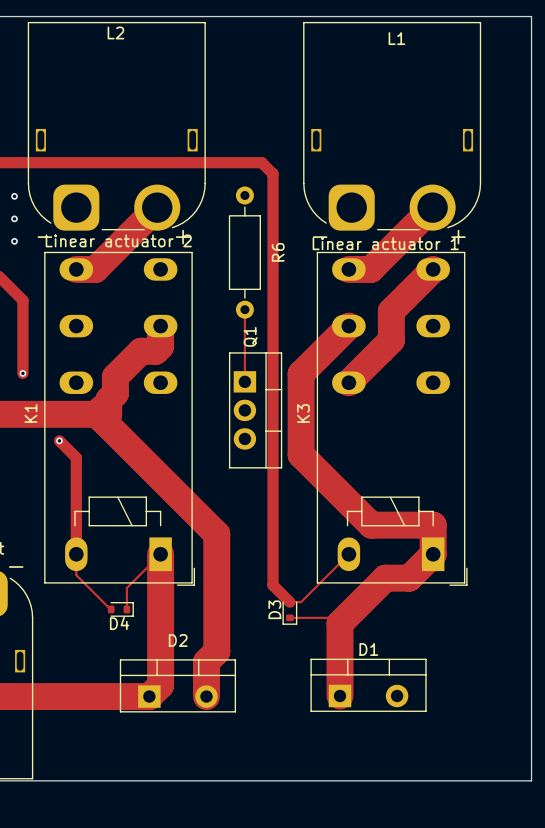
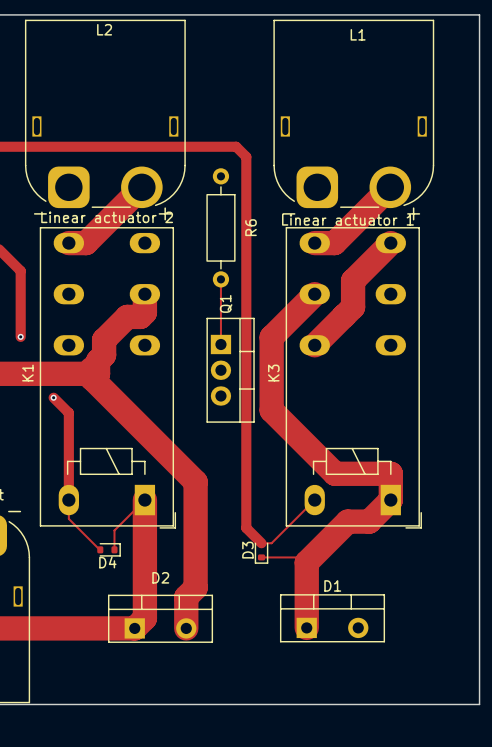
via: (14, 196) -> none
via: (14, 218) -> none
via: (14, 241) -> none

